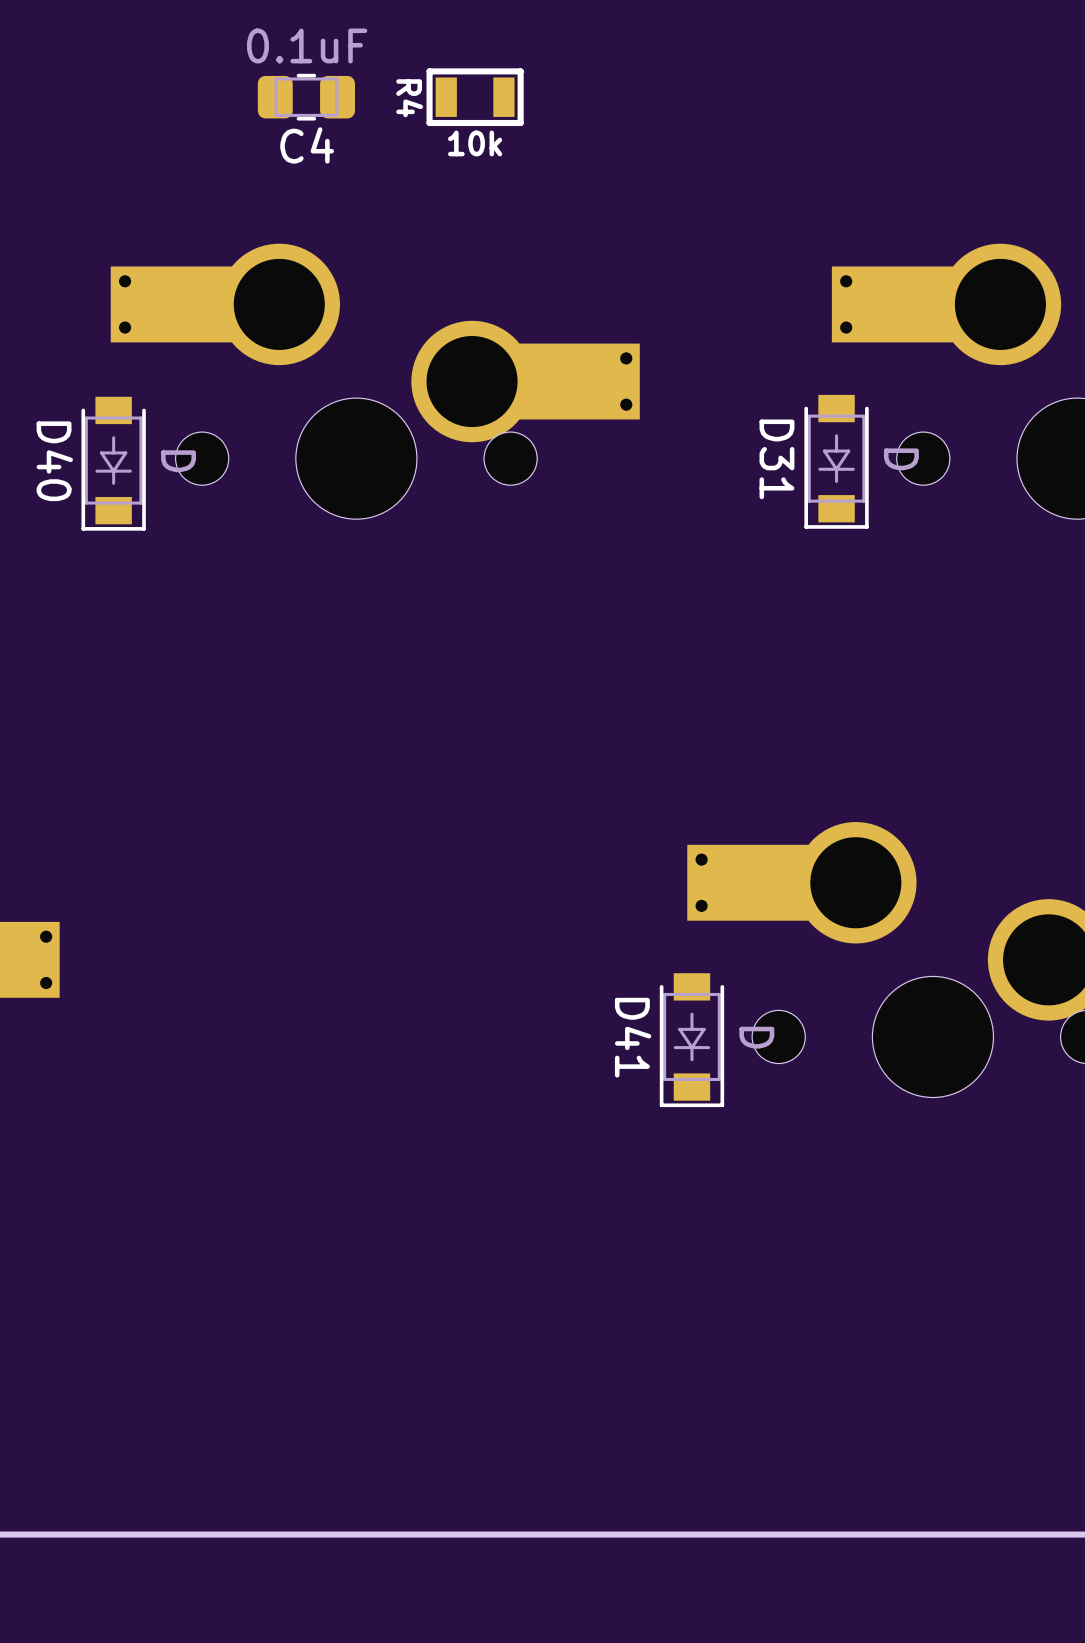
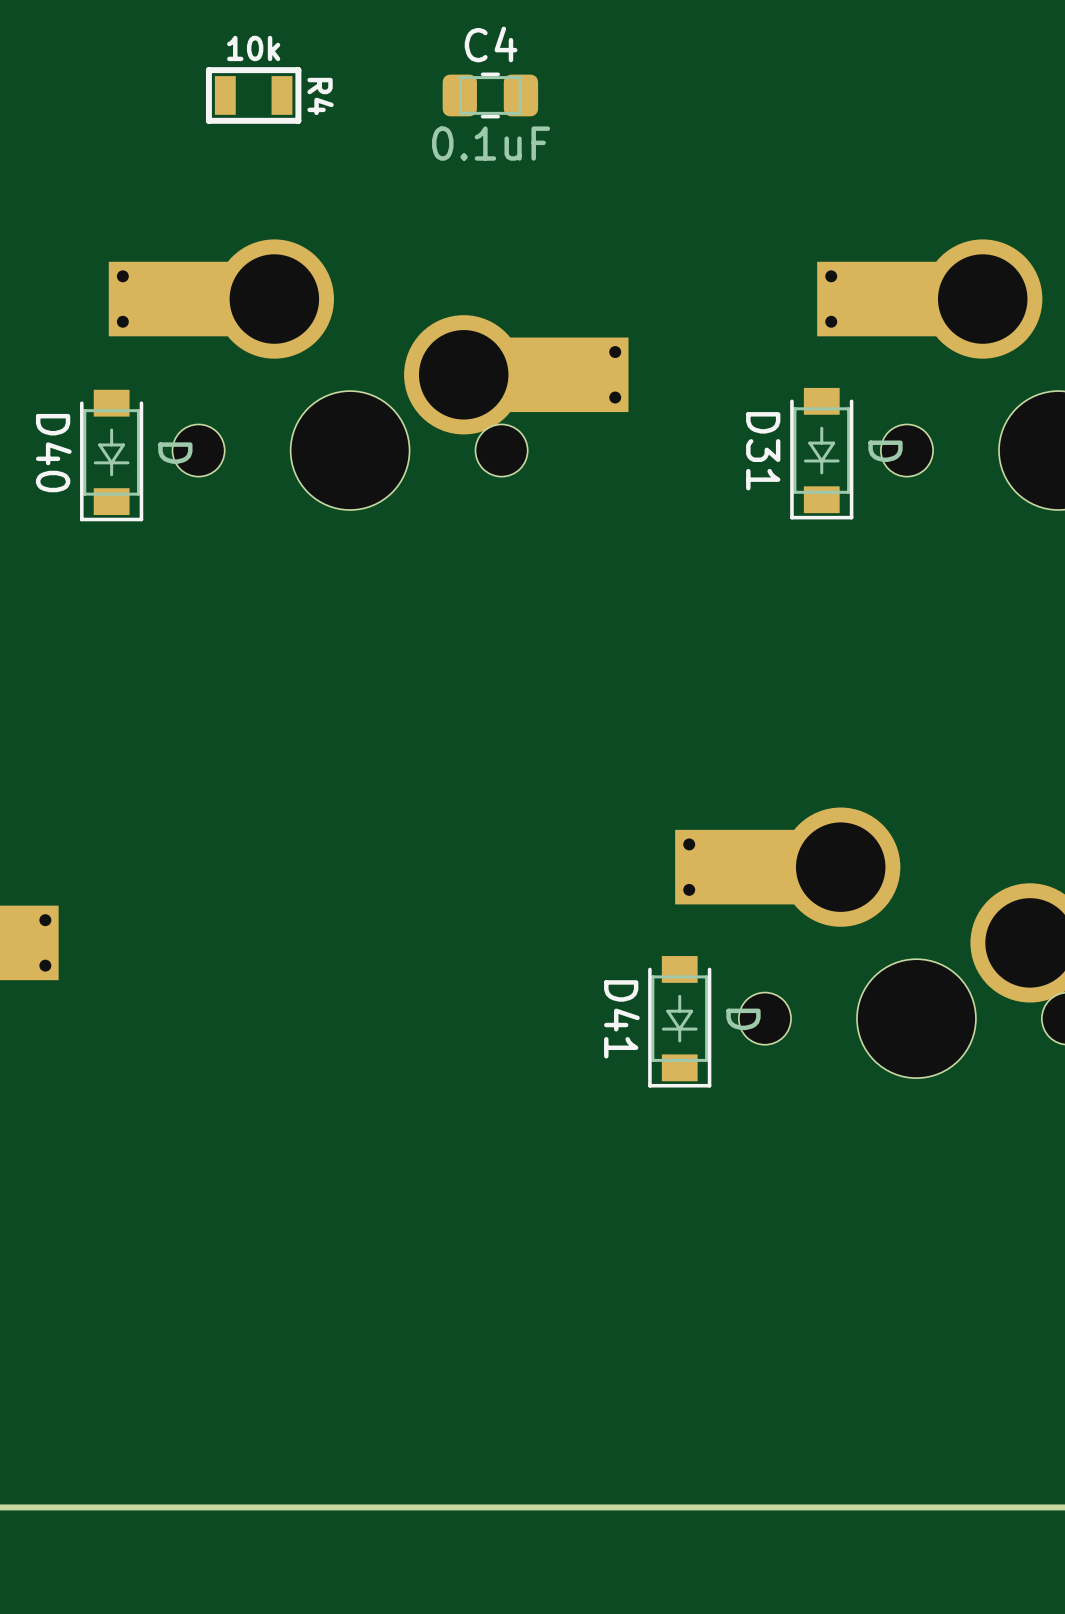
C4 value position: 0.1uF (307, 45) -> 0.1uF (491, 143)
C4 position: (306, 97) -> (490, 95)
R4 position: (475, 97) -> (253, 95)
R4 name position: R4 (409, 98) -> R4 (320, 96)
R4 value position: 10k (475, 143) -> 10k (253, 48)
C4 name position: C4 (307, 145) -> C4 (491, 44)

